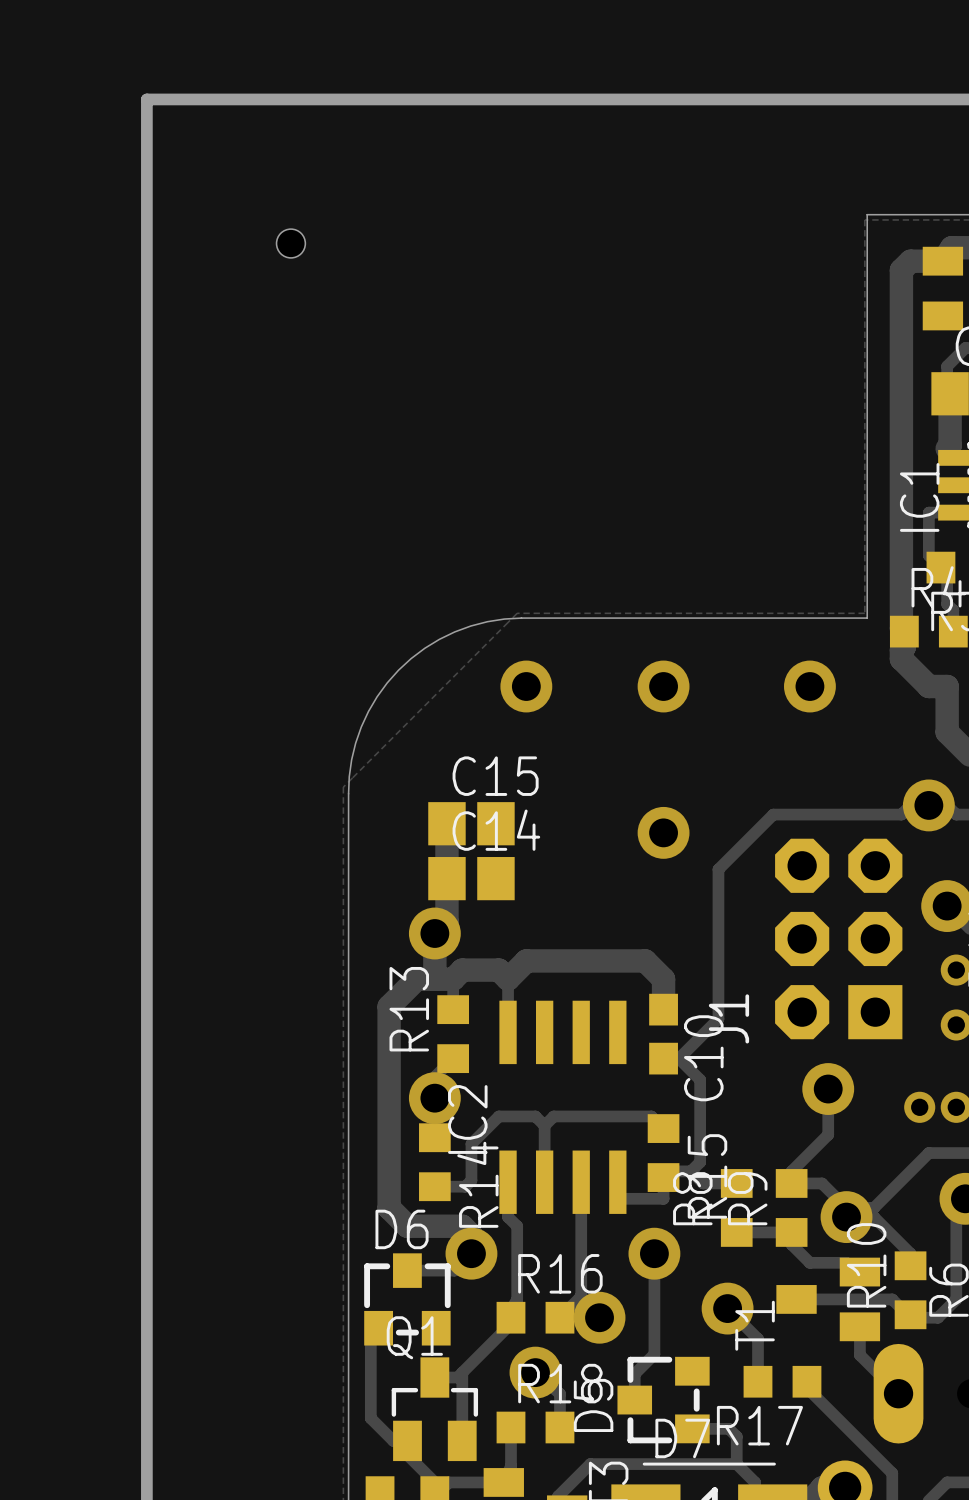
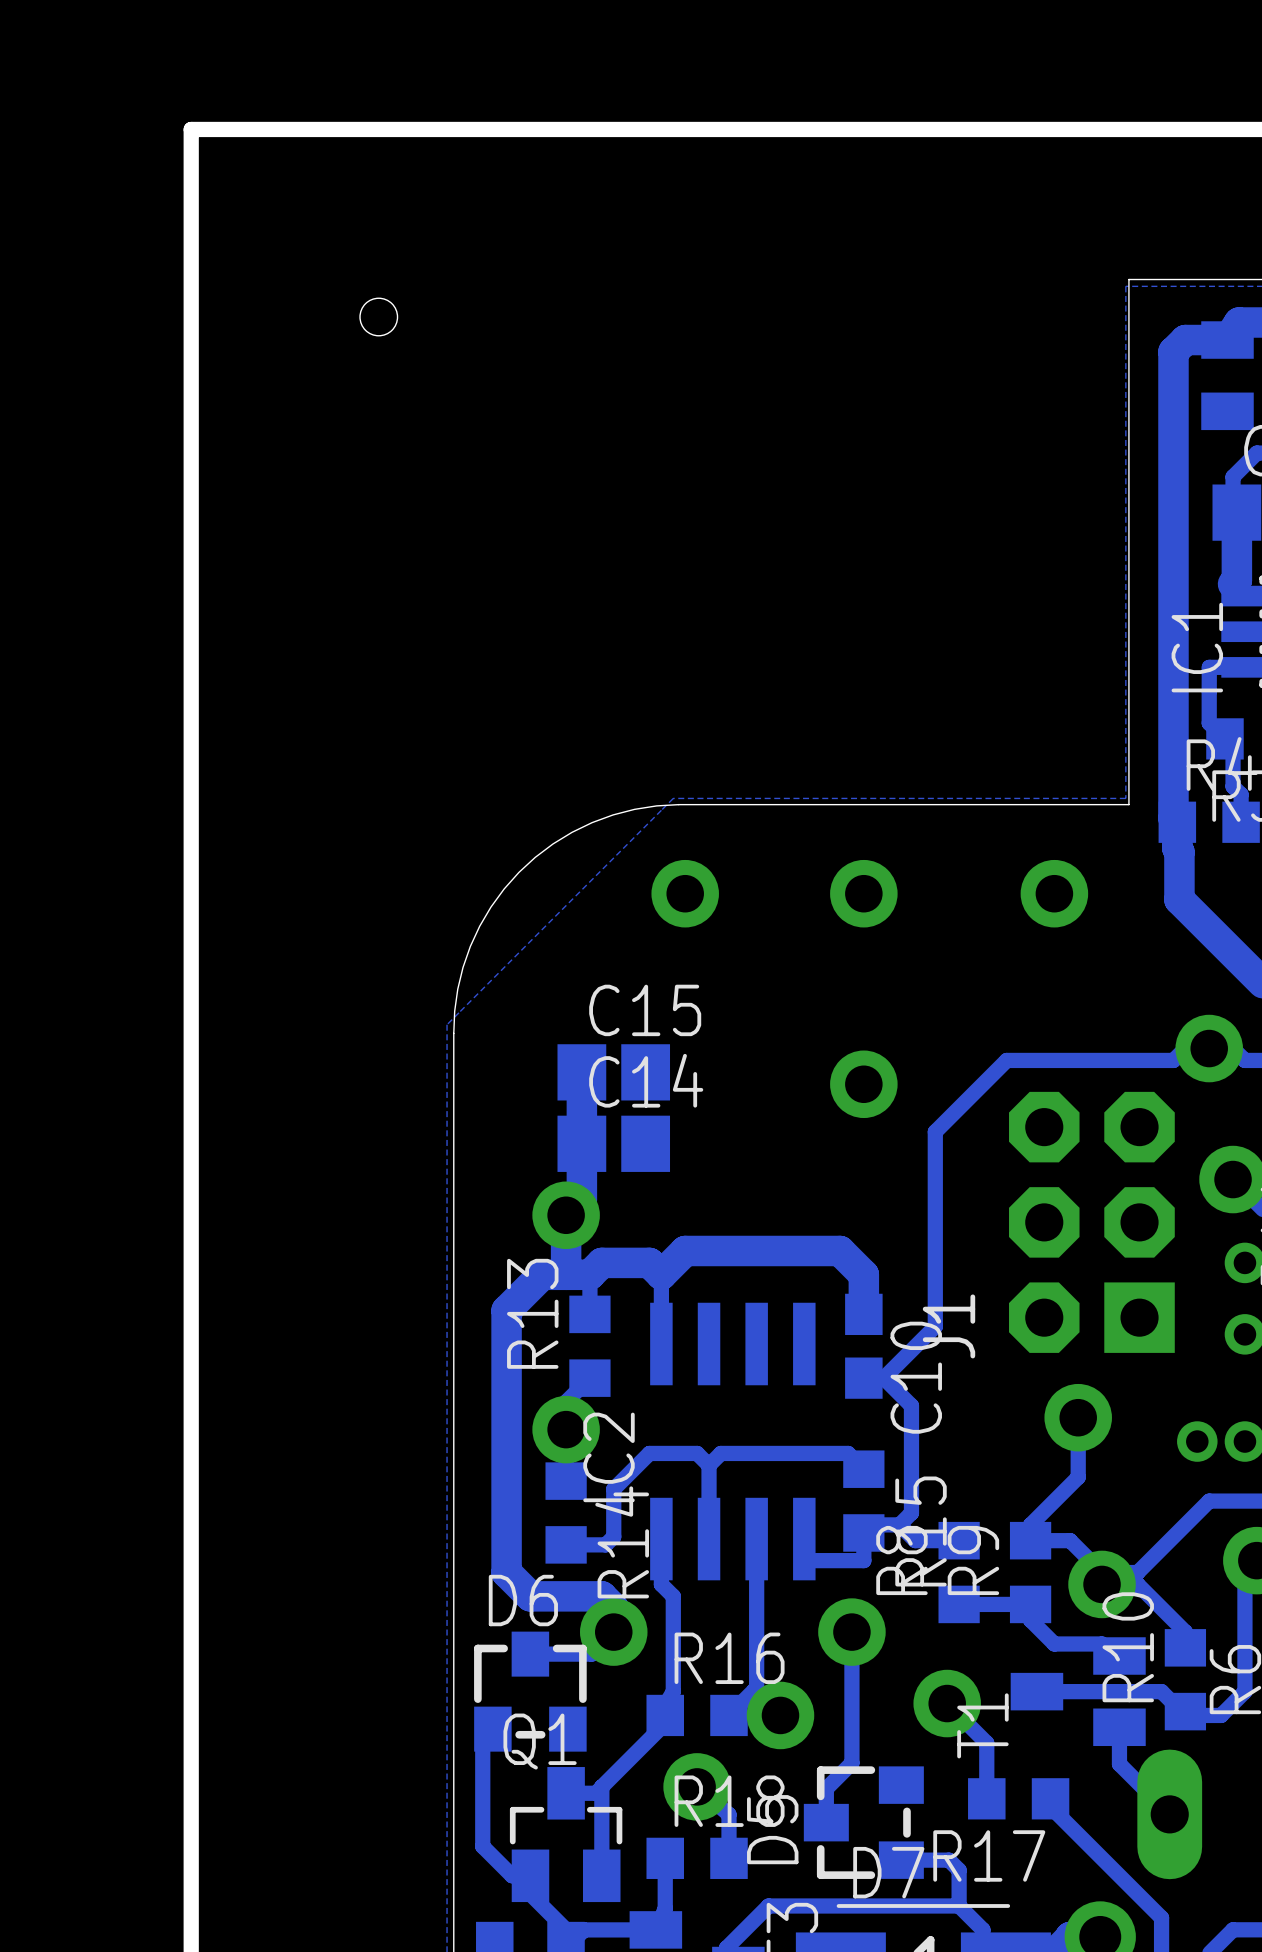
track: (904, 646) (901, 649) (901, 659) (928, 686) (947, 686) (947, 732) -> (1177, 842) (1179, 852) (1179, 899) (1233, 953)

